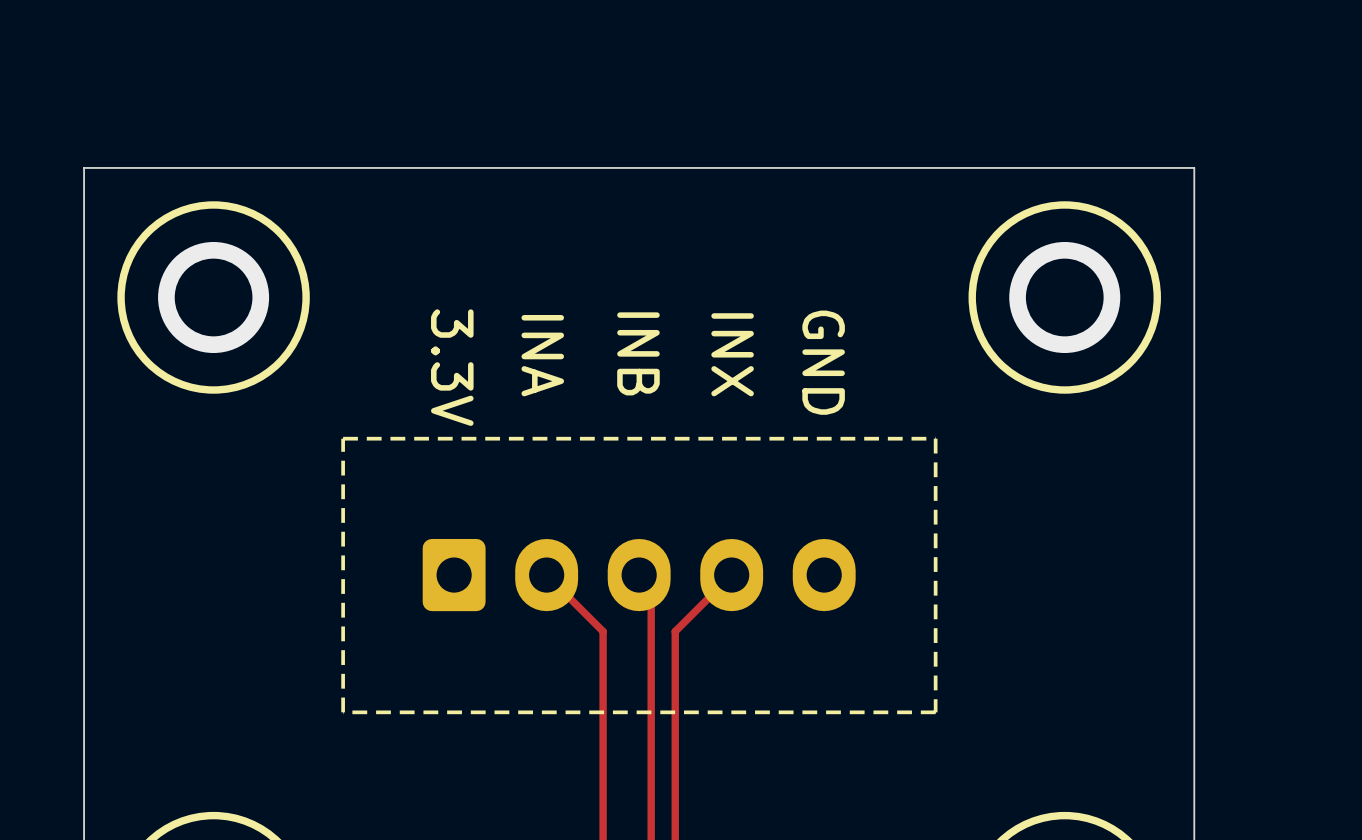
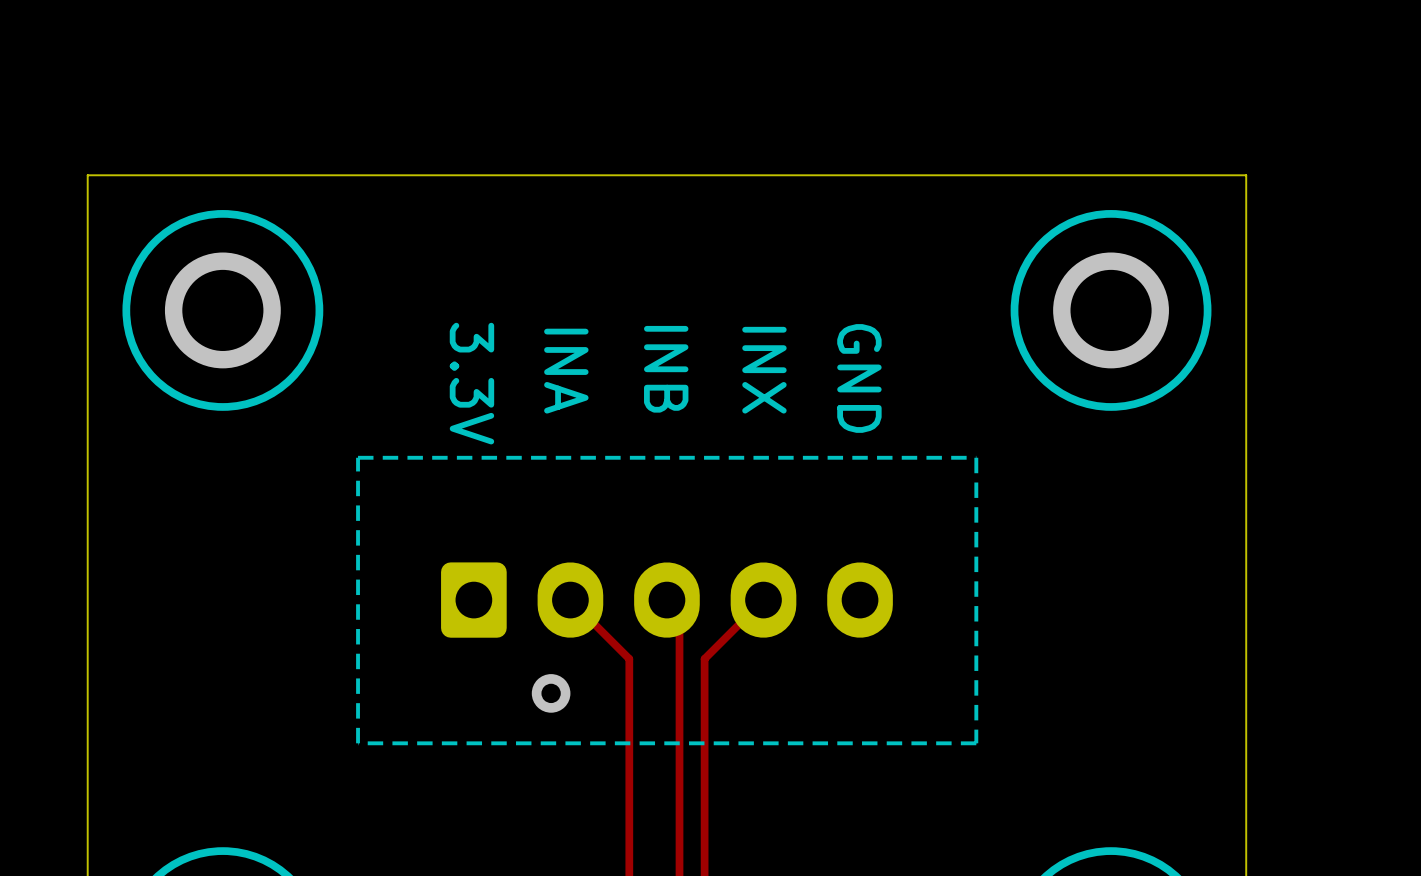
via: none -> (551, 693)

